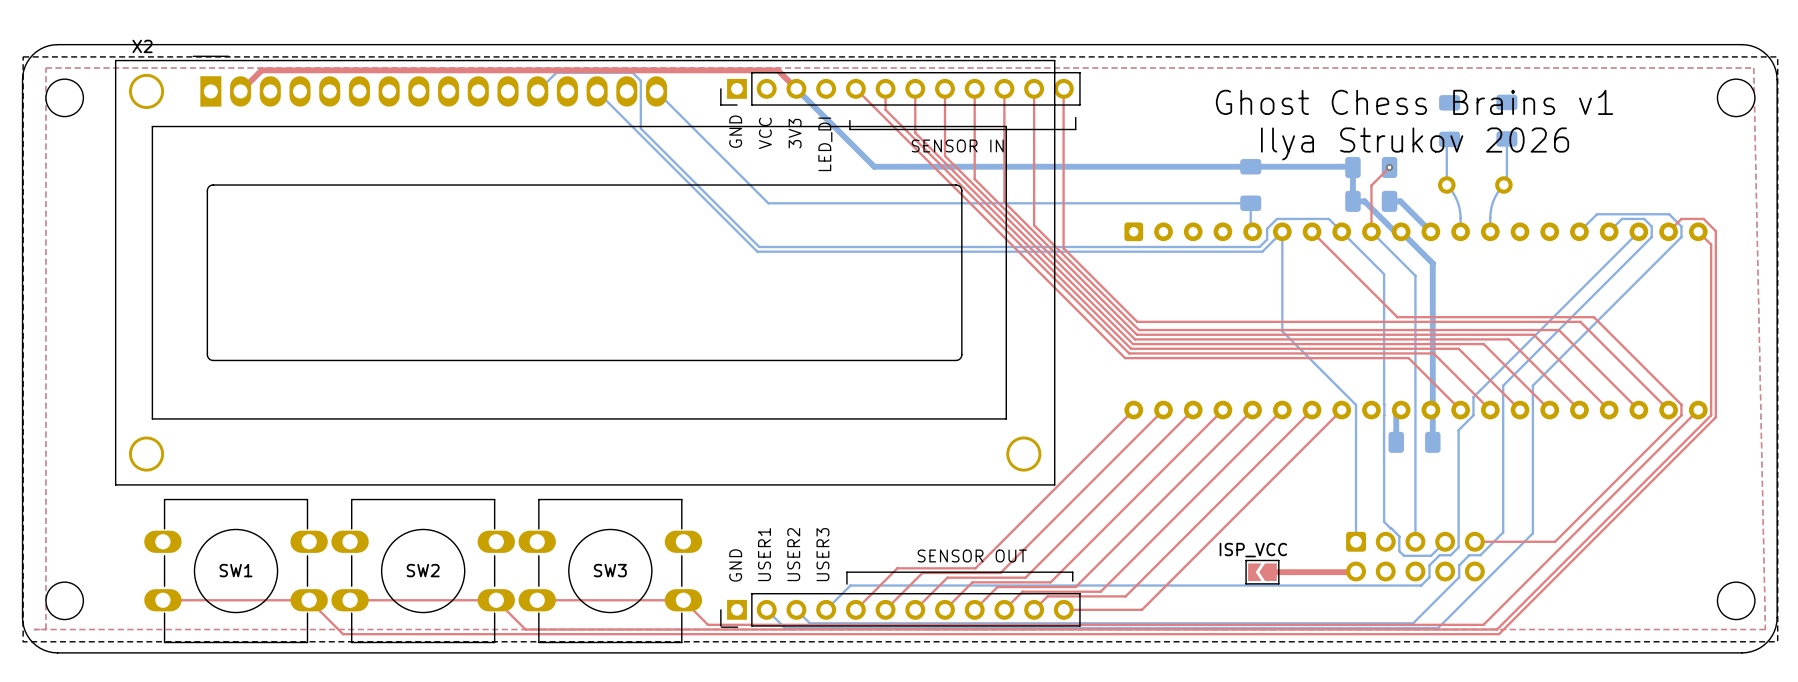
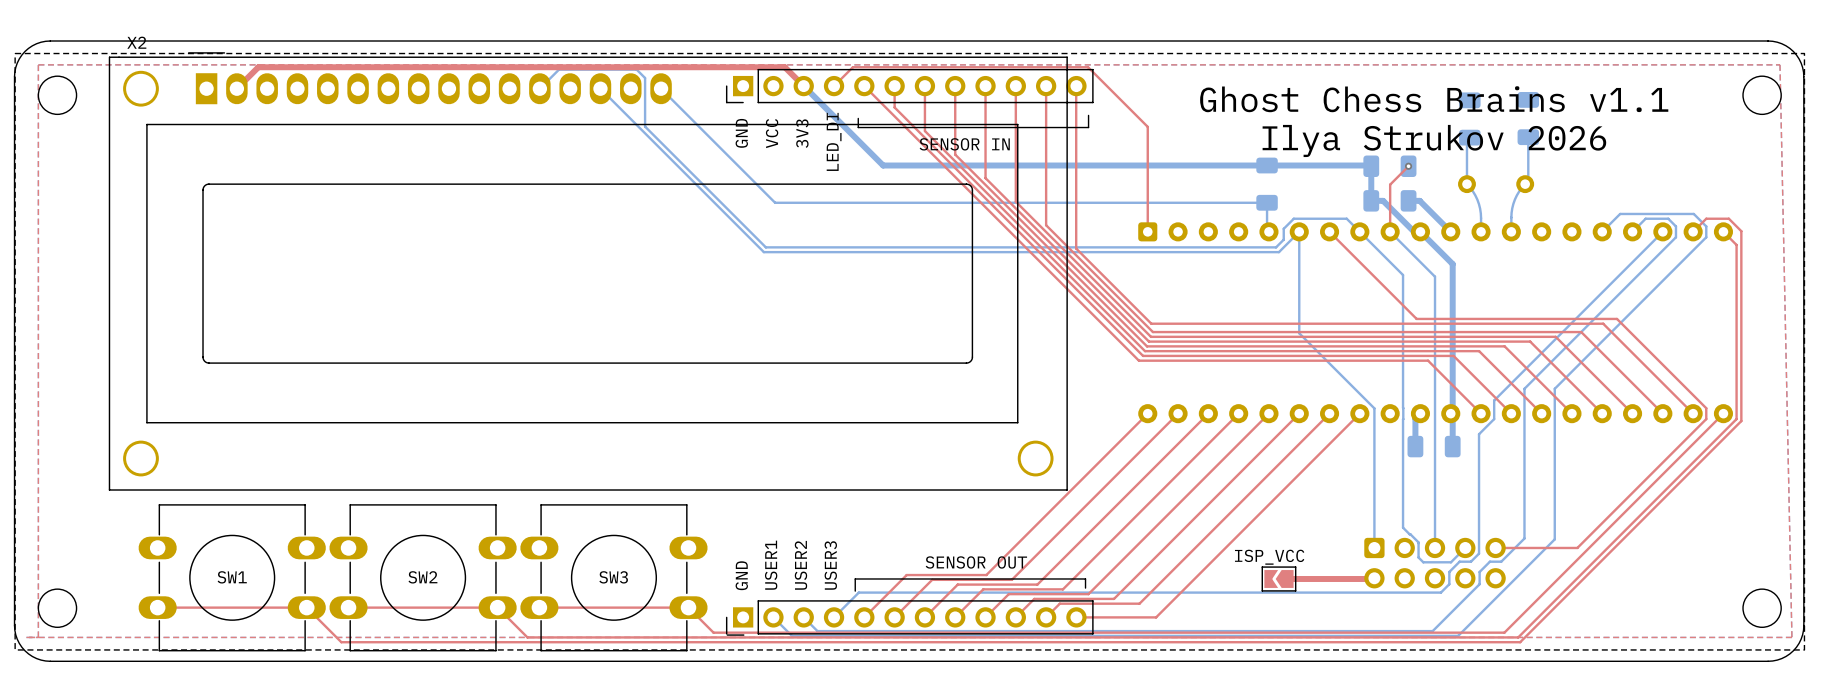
top track: none -> (834, 86) (852, 67) (1088, 67) (1147, 126) (1147, 231)
text: Ghost Chess Brains v1 (1414, 102) -> Ghost Chess Brains v1.1 (1434, 99)

